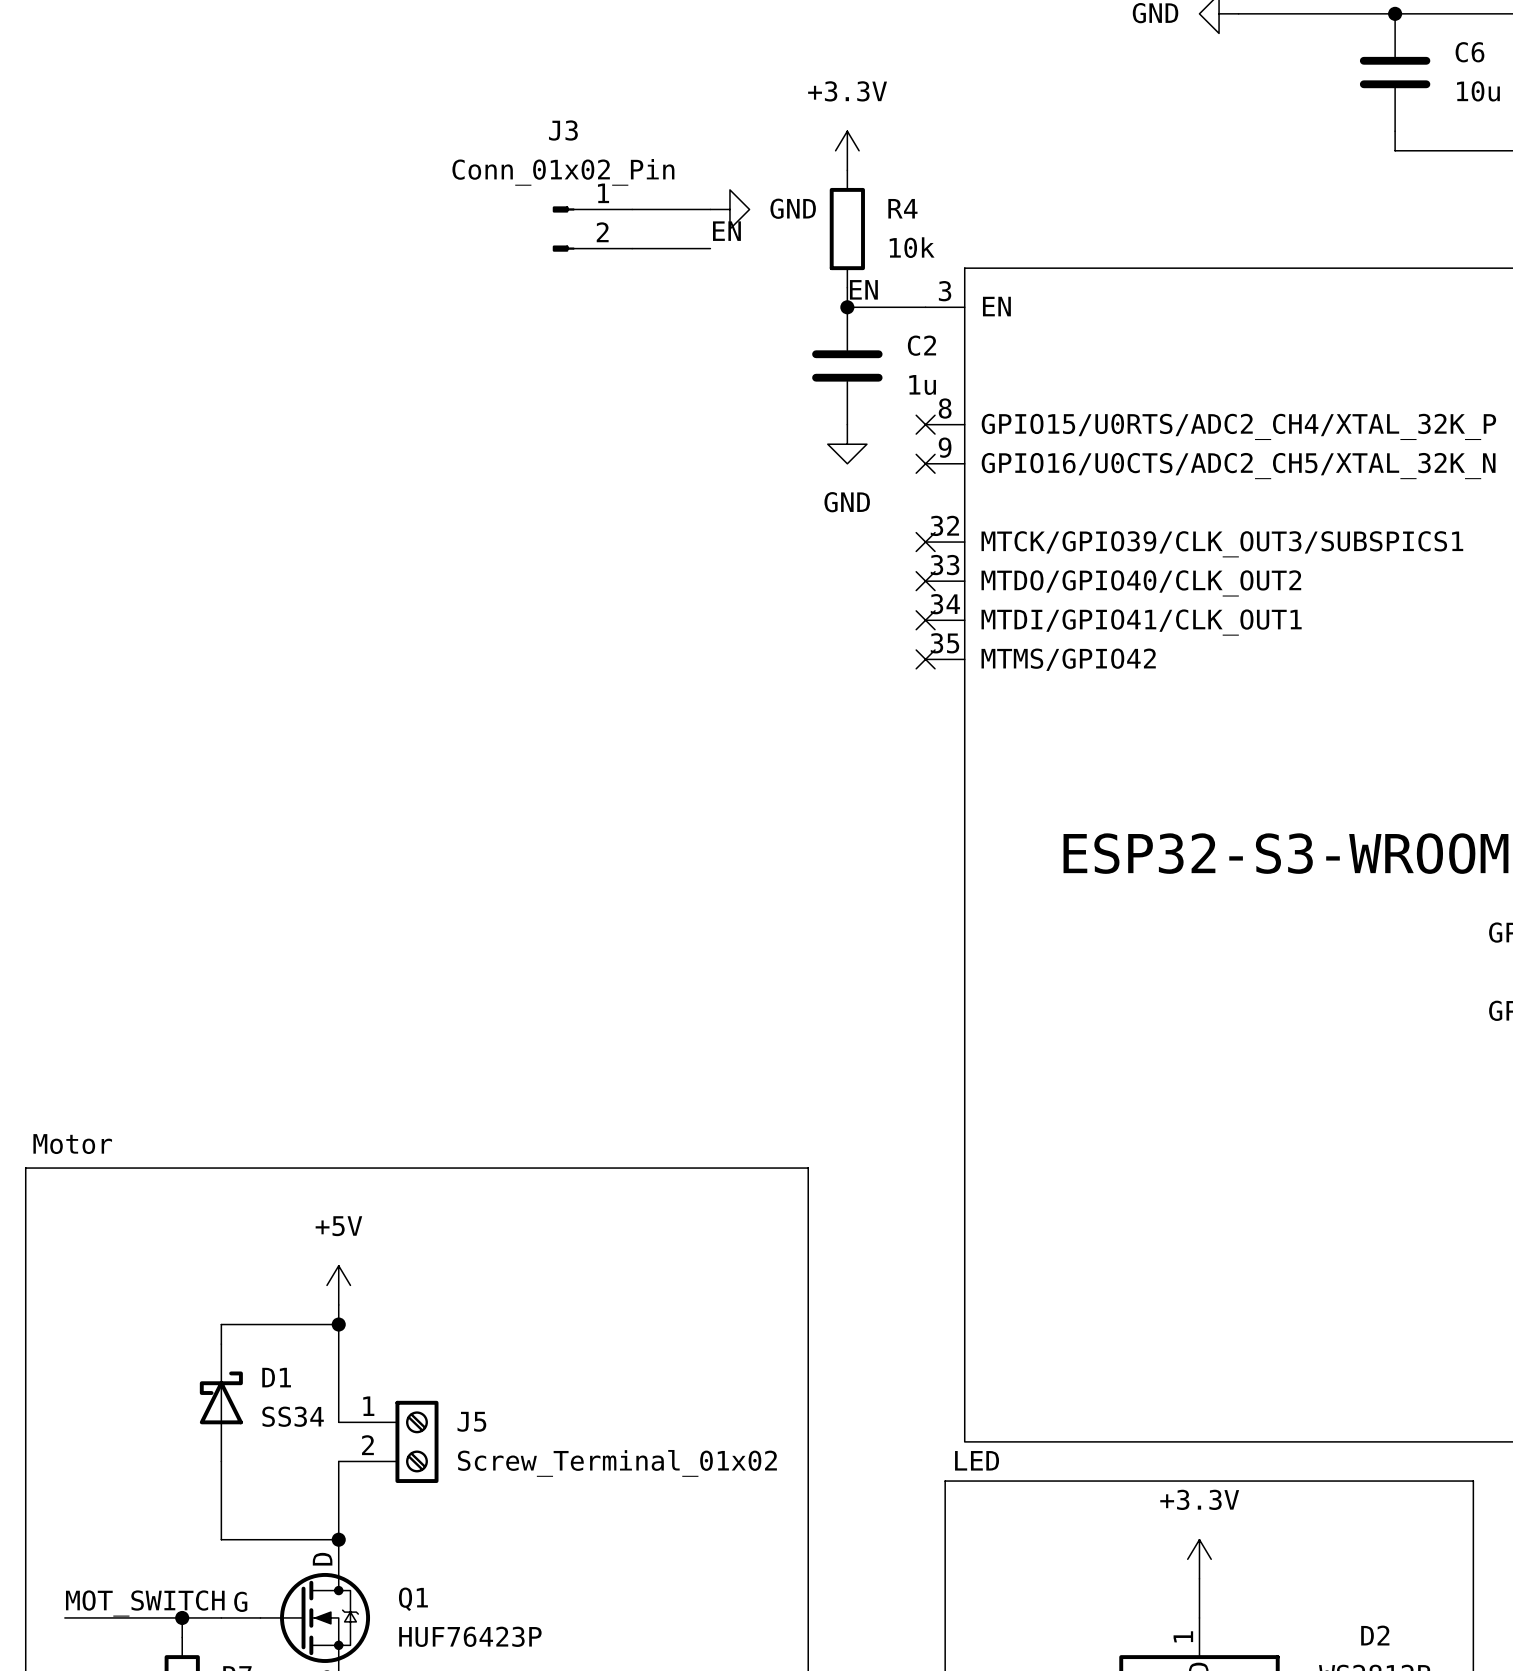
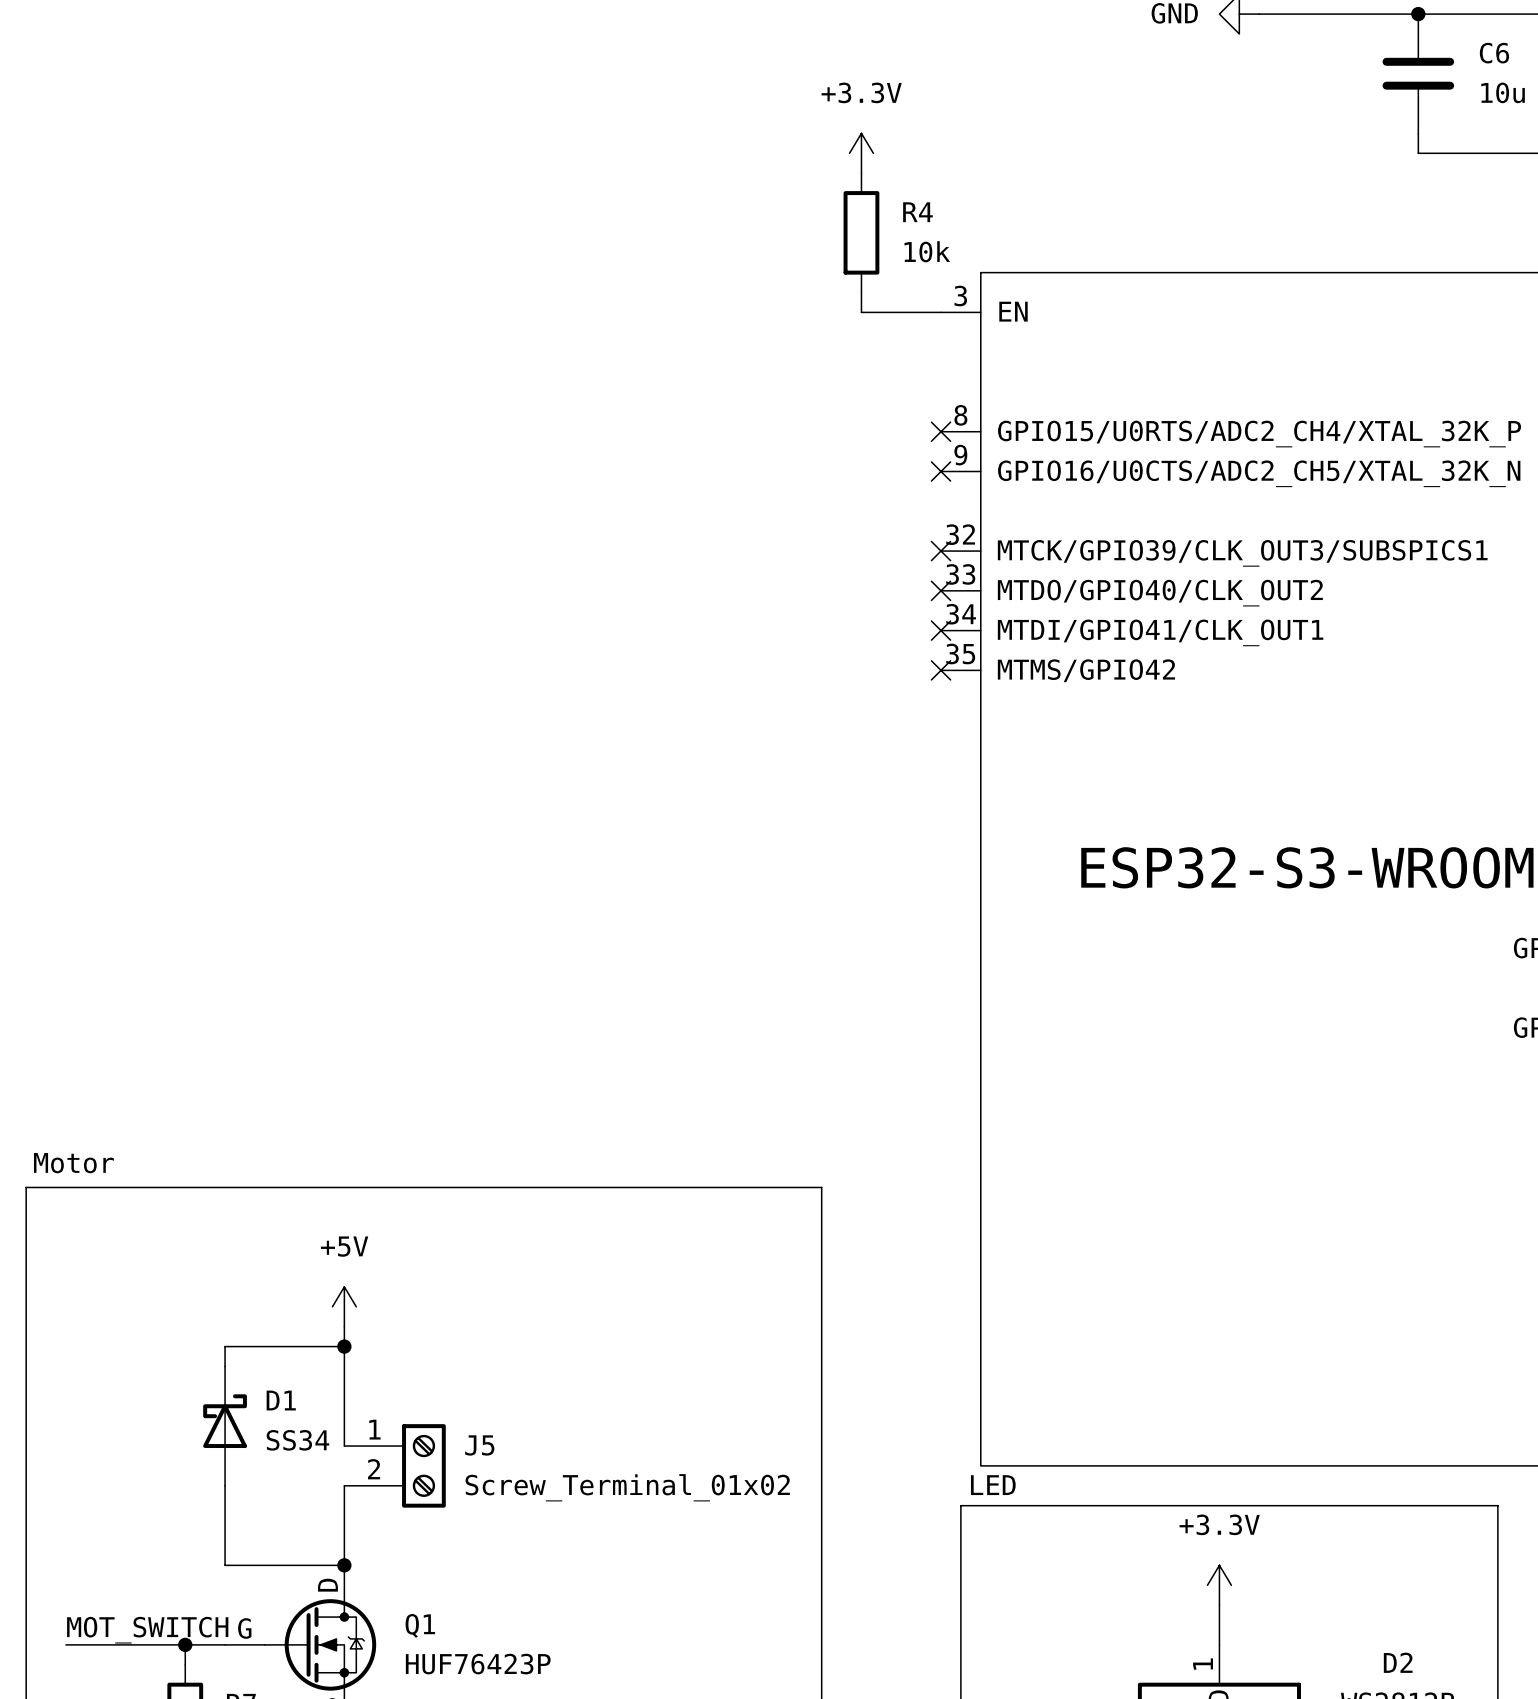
wire: (632, 209) (710, 209) -> none
power symbol: GND (729, 209) -> none
J3: Conn_01x02_Pin (592, 229) -> none
label: EN (726, 231) -> none
wire: (632, 248) (710, 248) -> none
label: EN (863, 289) -> none
junction: (847, 307) -> none
C2: 1u (847, 365) -> none
power symbol: GND (847, 444) -> none

